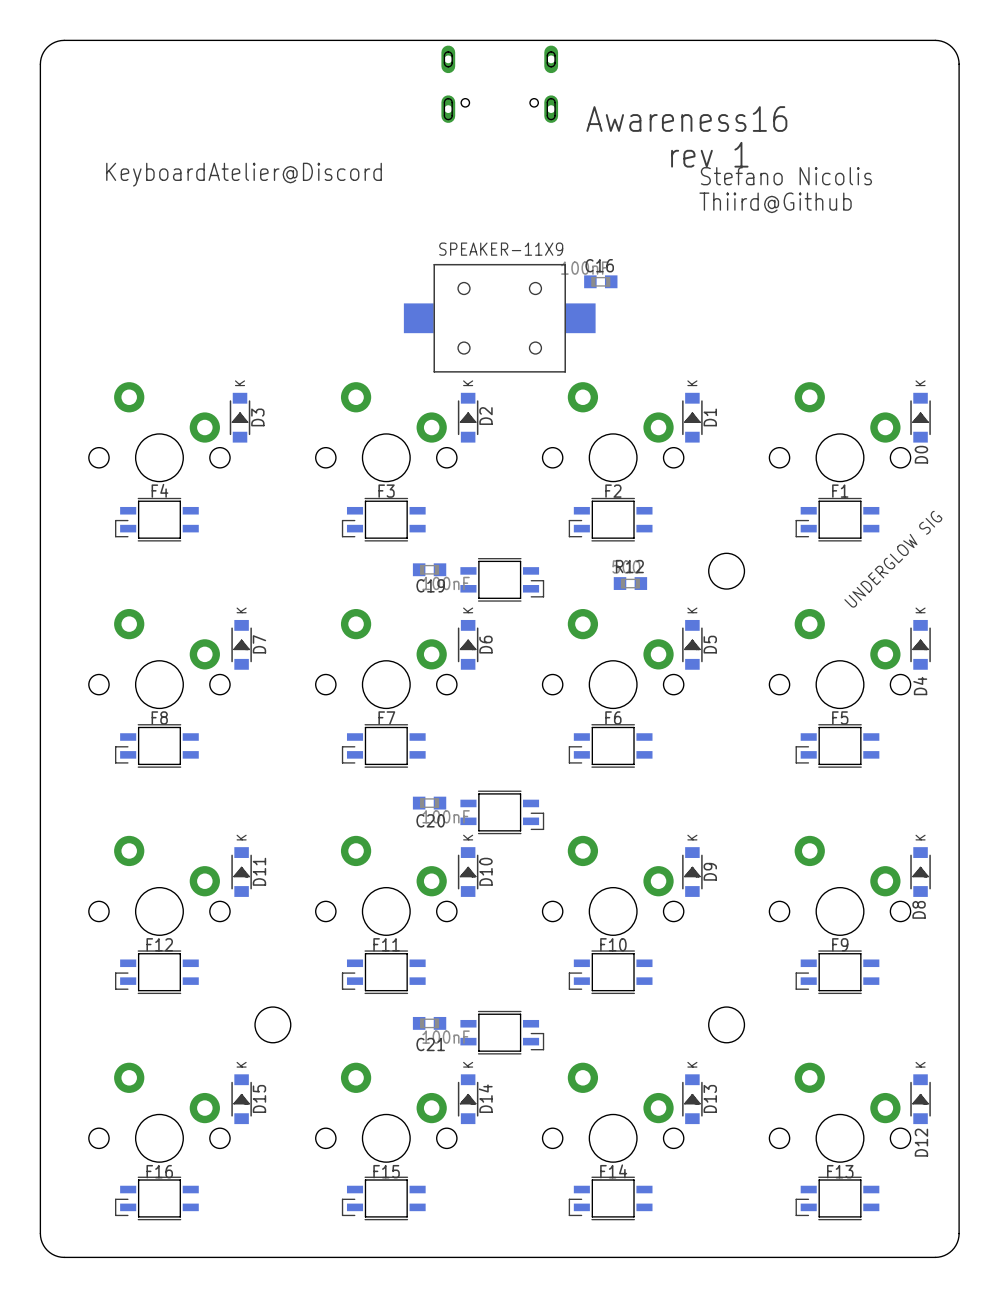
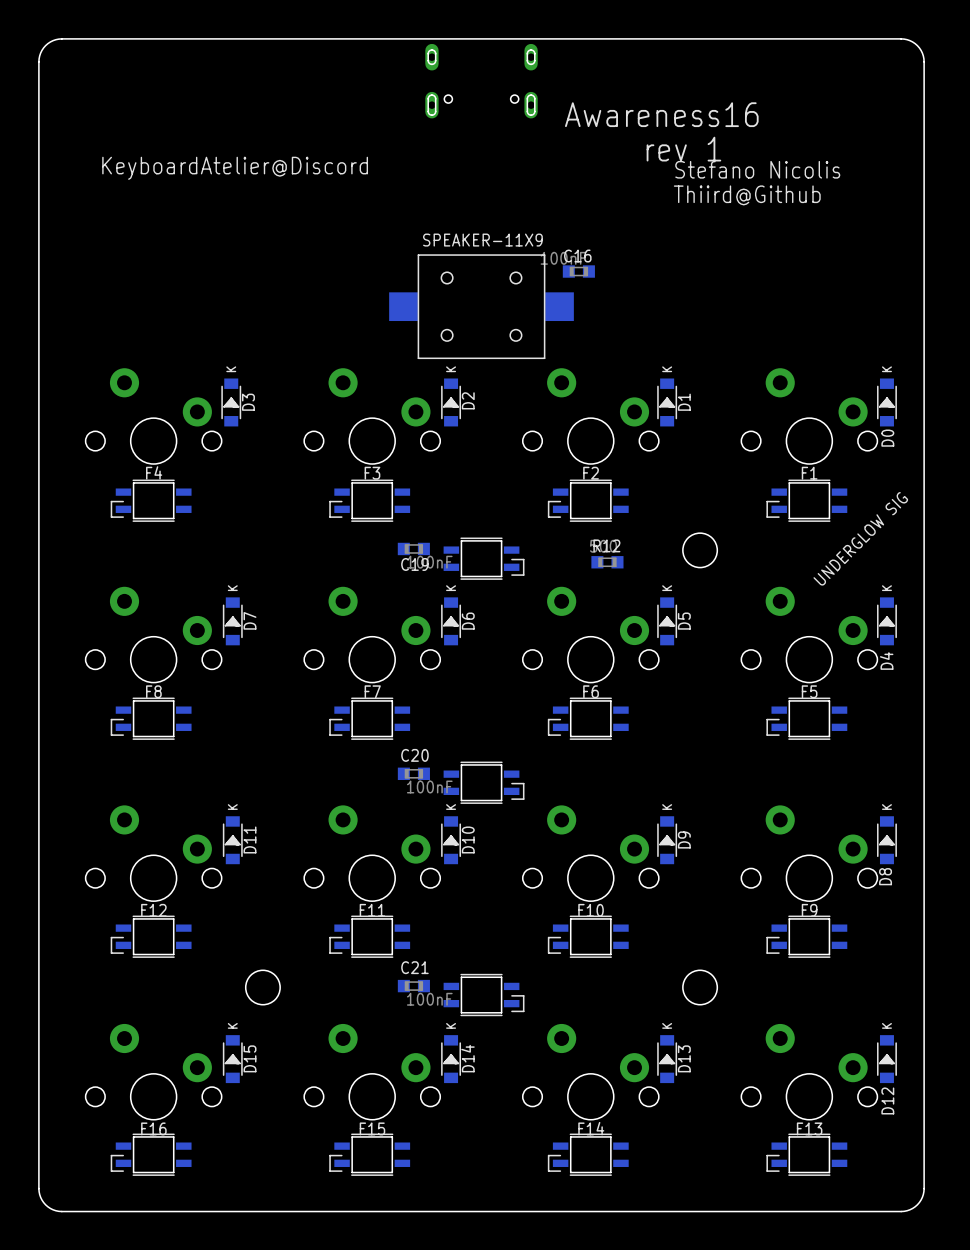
C20 name position: C20 (430, 820) -> C20 (414, 755)
C21 name position: C21 (430, 1044) -> C21 (414, 967)

